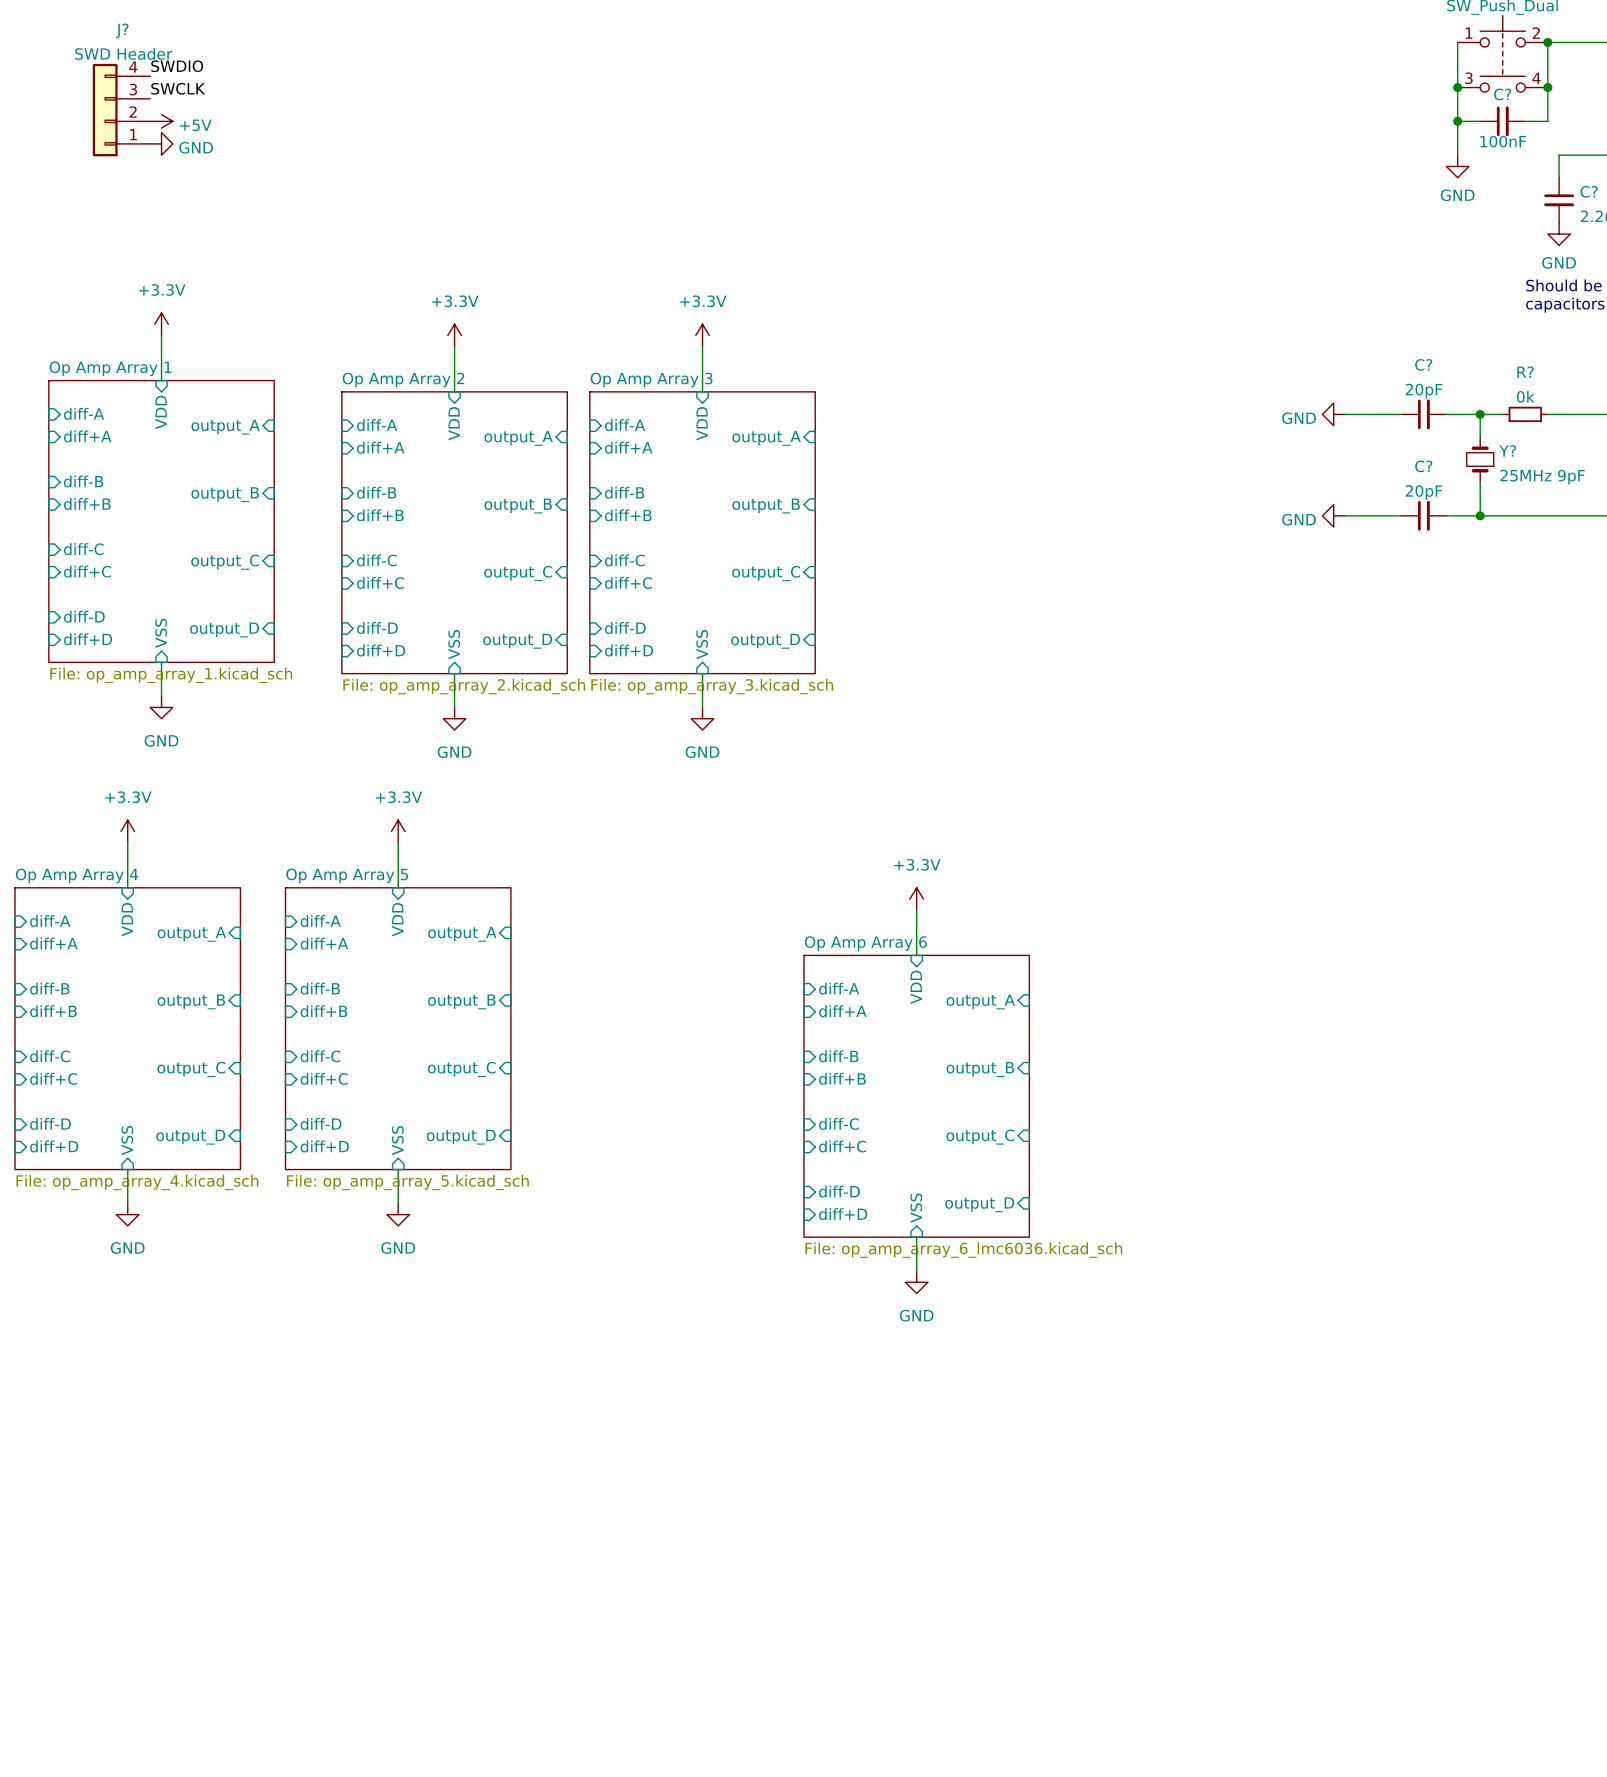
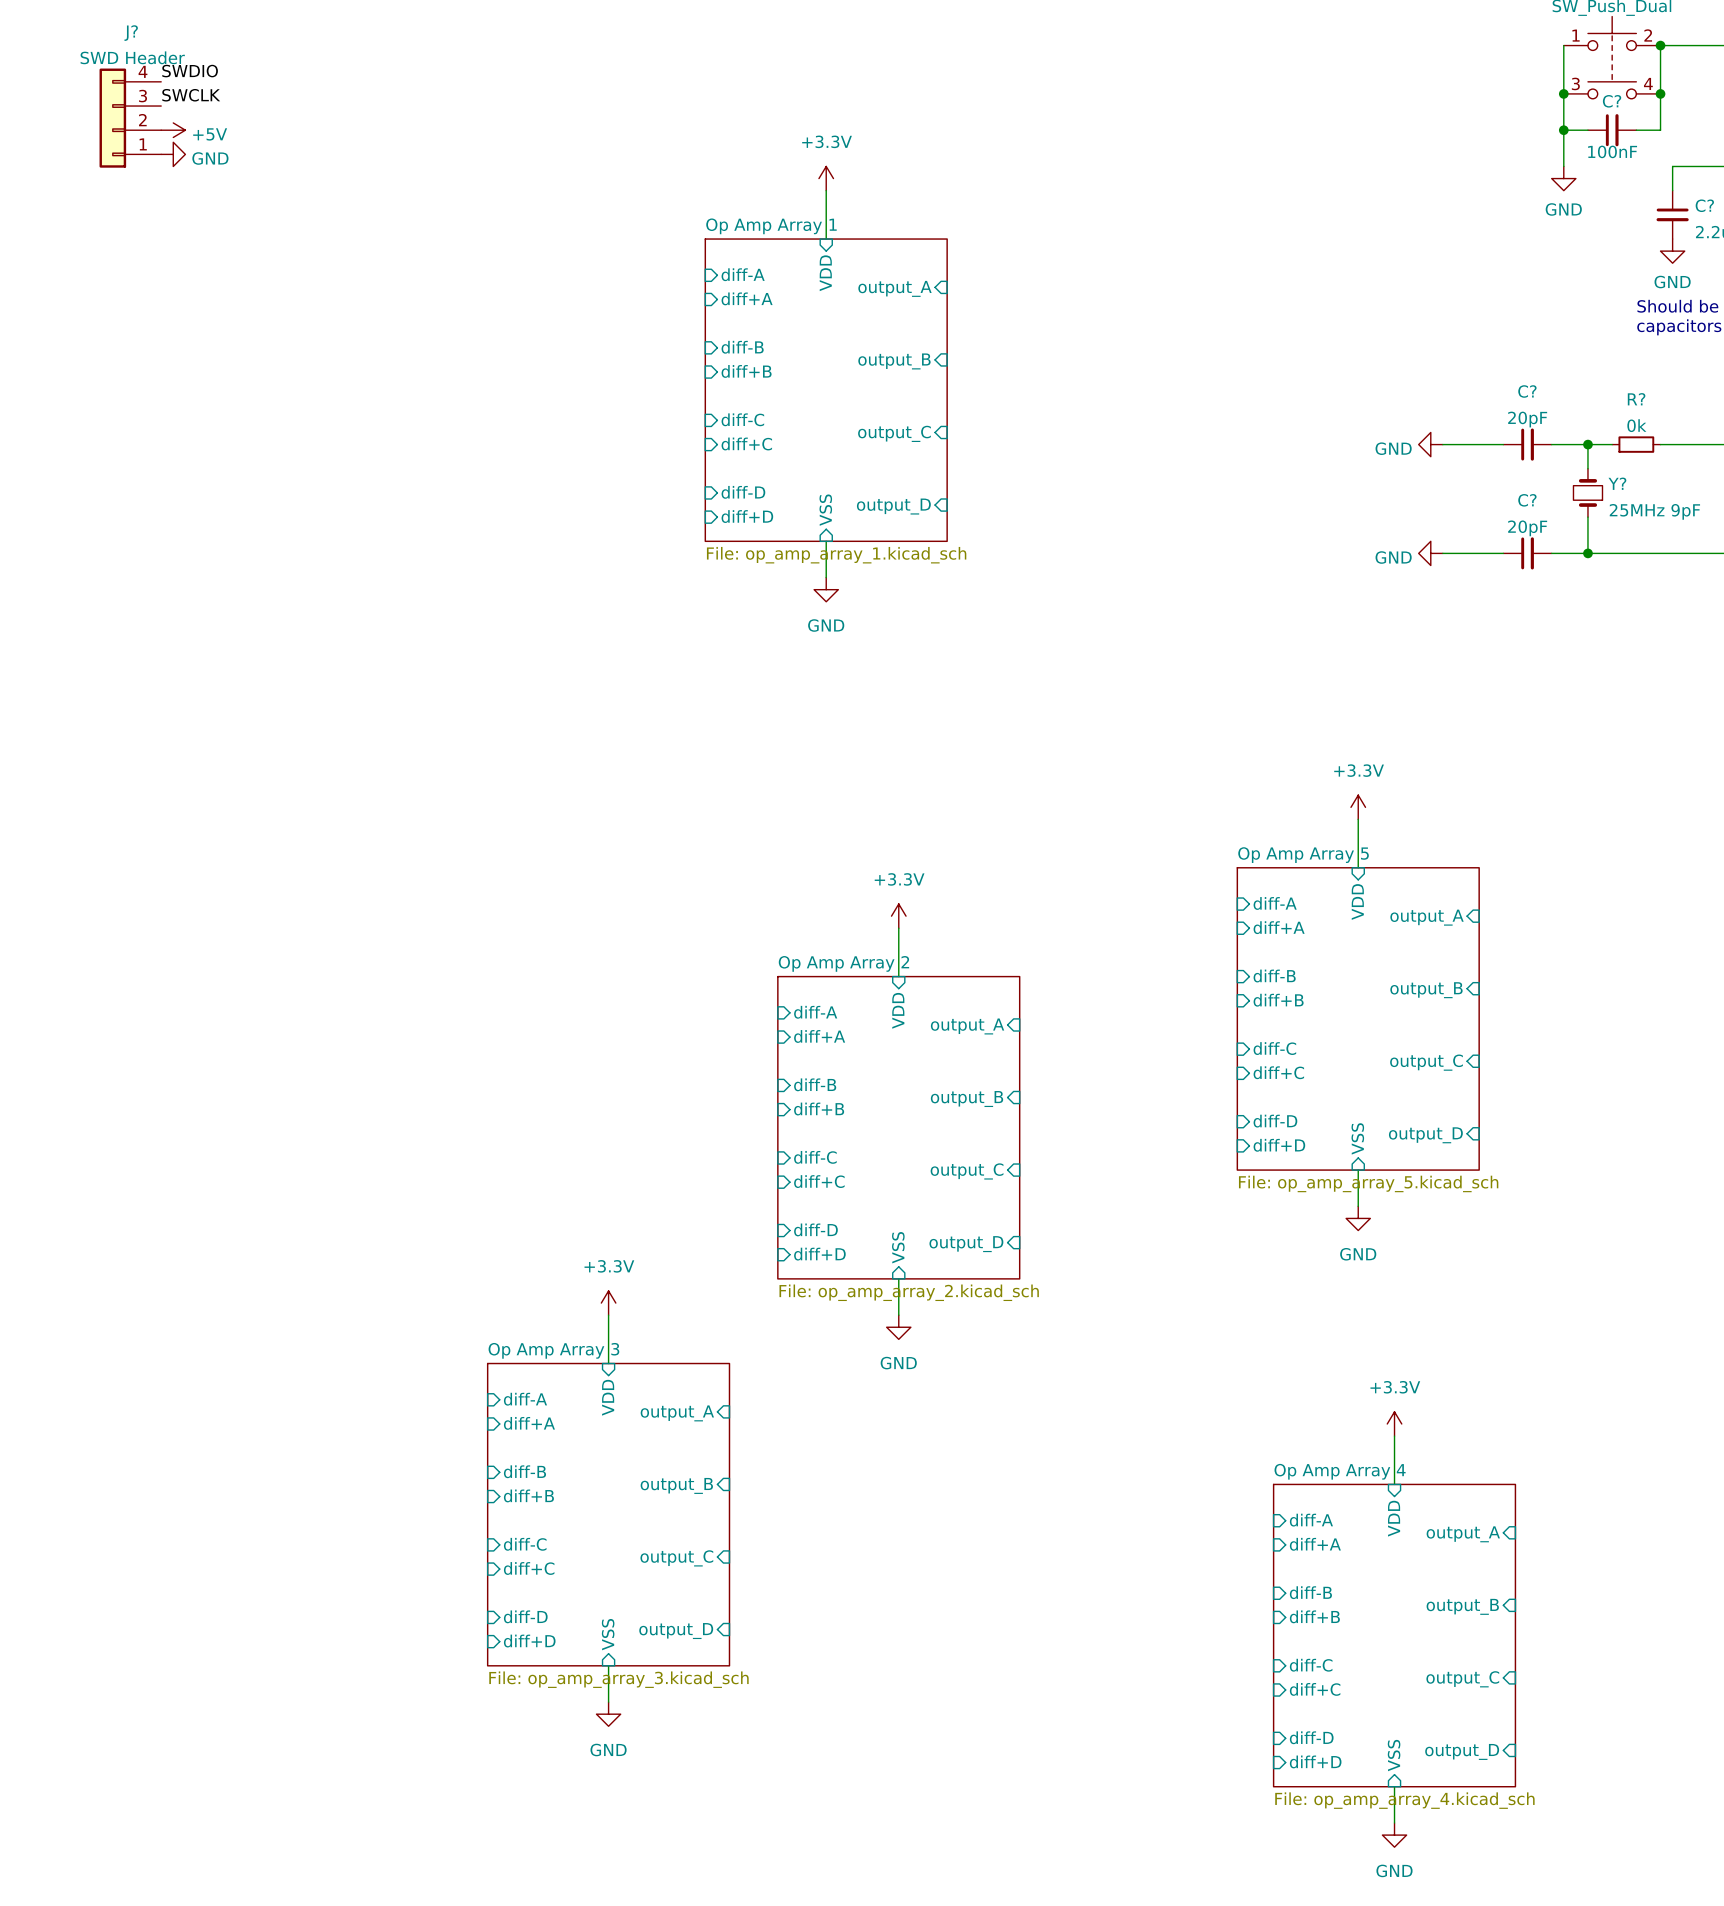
power symbol: none -> +3.3V (826, 178)
sheet pin: none -> VDD (825, 273)
sheet pin: none -> diff-A (743, 274)
sheet pin: none -> output_A (895, 288)
sheet pin: none -> diff+A (747, 298)
sheet pin: none -> diff-B (742, 347)
power symbol: +3.3V (161, 324) -> none
wire: (161, 335) (161, 380) -> none
power symbol: +3.3V (454, 335) -> none
power symbol: +3.3V (702, 335) -> none
sheet pin: none -> output_B (894, 361)
wire: (454, 346) (454, 391) -> none
sheet pin: none -> diff+B (746, 371)
wire: (702, 346) (702, 391) -> (826, 190) (826, 239)
sheet pin: none -> diff-C (742, 419)
sheet pin: none -> output_C (894, 433)
sheet pin: VDD (161, 412) -> none
sheet pin: diff-A (84, 413) -> none
sheet pin: VDD (454, 423) -> none
sheet pin: VDD (702, 423) -> none
sheet pin: diff-A (377, 425) -> none
sheet pin: diff-A (625, 425) -> diff+C (746, 443)
sheet pin: output_A (225, 427) -> none
sheet pin: diff+A (87, 436) -> none
sheet pin: output_A (518, 438) -> none
sheet pin: output_A (766, 438) -> none
sheet pin: diff+A (380, 447) -> none
sheet pin: diff+A (628, 447) -> diff-D (743, 492)
sheet pin: none -> output_D (893, 506)
sheet pin: none -> VSS (825, 510)
sheet pin: diff-B (83, 481) -> none
sheet pin: diff-B (376, 492) -> none
sheet pin: diff-B (624, 492) -> diff+D (747, 516)
sheet pin: output_B (225, 494) -> none
sheet pin: diff+B (87, 504) -> none
sheet pin: output_B (518, 505) -> none
sheet pin: output_B (766, 505) -> none
sheet pin: diff+B (380, 515) -> none
sheet pin: diff+B (628, 515) -> none
sheet Op Amp Array 1 position: (161, 521) -> (826, 390)
sheet Op Amp Array 2 position: (454, 532) -> (898, 1127)
sheet Op Amp Array 3 position: (702, 532) -> (608, 1514)
sheet pin: diff-C (83, 549) -> none
power symbol: none -> GND (826, 589)
sheet pin: diff-C (376, 560) -> none
sheet pin: diff-C (624, 560) -> none
sheet pin: output_C (225, 562) -> none
sheet pin: diff+C (87, 571) -> none
sheet pin: output_C (518, 573) -> none
sheet pin: output_C (766, 573) -> none
sheet pin: diff+C (380, 582) -> none
sheet pin: diff+C (628, 582) -> none
sheet pin: diff-D (84, 616) -> none
sheet pin: diff-D (377, 628) -> none
sheet pin: diff-D (625, 628) -> none
sheet pin: output_D (224, 629) -> none
sheet pin: VSS (161, 633) -> none
sheet pin: diff+D (88, 639) -> none
sheet pin: output_D (517, 641) -> none
sheet pin: output_D (765, 641) -> none
sheet pin: VSS (454, 644) -> none
sheet pin: VSS (702, 644) -> none
sheet pin: diff+D (381, 650) -> none
sheet pin: diff+D (629, 650) -> none
wire: (161, 662) (161, 696) -> none
wire: (454, 673) (454, 707) -> none
wire: (702, 673) (702, 707) -> (826, 541) (826, 577)
power symbol: GND (161, 707) -> none
power symbol: GND (454, 718) -> none
power symbol: GND (702, 718) -> none
power symbol: none -> +3.3V (1358, 807)
wire: none -> (1358, 819) (1358, 867)
power symbol: +3.3V (127, 831) -> none
power symbol: +3.3V (398, 831) -> none
sheet pin: none -> VDD (1357, 902)
wire: (127, 842) (127, 887) -> none
wire: (398, 842) (398, 887) -> none
sheet pin: none -> diff-A (1275, 903)
sheet pin: none -> output_A (1427, 917)
sheet pin: none -> diff+A (1279, 927)
power symbol position: +3.3V (916, 899) -> +3.3V (898, 916)
sheet pin: none -> diff-B (1274, 976)
wire: (916, 910) (916, 955) -> (898, 928) (898, 976)
sheet pin: VDD (127, 919) -> none
sheet pin: VDD (397, 919) -> none
sheet pin: diff-A (50, 921) -> none
sheet pin: diff-A (320, 921) -> none
sheet pin: none -> output_B (1426, 990)
sheet pin: none -> diff+B (1278, 1000)
sheet pin: output_A (191, 934) -> none
sheet pin: output_A (462, 934) -> none
sheet pin: diff+A (53, 943) -> none
sheet pin: diff+A (324, 943) -> none
sheet pin: none -> diff-C (1274, 1048)
sheet pin position: VDD (916, 987) -> VDD (898, 1010)
sheet pin: diff-B (49, 988) -> none
sheet pin: diff-B (320, 988) -> none
sheet pin position: diff-A (839, 988) -> diff-A (815, 1012)
sheet pin: none -> output_C (1426, 1062)
sheet pin: none -> diff+C (1278, 1072)
sheet pin: output_B (191, 1001) -> none
sheet pin: output_B (461, 1001) -> none
sheet pin position: output_A (980, 1001) -> output_A (967, 1026)
sheet pin: diff+B (53, 1011) -> none
sheet pin: diff+B (323, 1011) -> none
sheet pin position: diff+A (842, 1011) -> diff+A (819, 1036)
sheet Op Amp Array 4 position: (127, 1028) -> (1394, 1635)
sheet Op Amp Array 5 position: (398, 1028) -> (1358, 1018)
sheet pin: none -> diff-D (1275, 1121)
sheet pin: diff-C (50, 1056) -> none
sheet pin: diff-C (320, 1056) -> none
sheet pin position: diff-B (838, 1056) -> diff-B (815, 1084)
sheet pin: none -> output_D (1425, 1135)
sheet pin: none -> VSS (1357, 1138)
sheet pin: none -> diff+D (1279, 1145)
sheet pin: output_C (191, 1069) -> none
sheet pin: output_C (461, 1069) -> none
sheet pin position: output_B (980, 1069) -> output_B (967, 1099)
sheet pin: diff+C (53, 1078) -> none
sheet pin: diff+C (324, 1078) -> none
sheet pin position: diff+B (842, 1078) -> diff+B (819, 1109)
wire: none -> (1358, 1170) (1358, 1206)
sheet Op Amp Array 6: File: op_amp_array_6_lmc6036.kicad_sch (916, 1096) -> none
sheet pin: diff-D (50, 1123) -> none
sheet pin: diff-D (321, 1123) -> none
sheet pin position: diff-C (838, 1123) -> diff-C (815, 1157)
power symbol: none -> GND (1358, 1218)
sheet pin: output_D (190, 1137) -> none
sheet pin: output_D (461, 1137) -> none
sheet pin position: output_C (980, 1137) -> output_C (967, 1171)
sheet pin: VSS (127, 1140) -> none
sheet pin: VSS (397, 1140) -> none
sheet pin: diff+D (54, 1146) -> none
sheet pin: diff+D (324, 1146) -> none
sheet pin position: diff+C (842, 1146) -> diff+C (819, 1181)
wire: (127, 1169) (127, 1203) -> none
wire: (398, 1169) (398, 1203) -> none
sheet pin position: diff-D (839, 1191) -> diff-D (815, 1229)
sheet pin position: output_D (979, 1204) -> output_D (966, 1244)
sheet pin position: VSS (916, 1208) -> VSS (898, 1247)
power symbol: GND (127, 1214) -> none
power symbol: GND (398, 1214) -> none
power symbol: none -> +3.3V (608, 1303)
sheet pin position: diff+D (843, 1214) -> diff+D (819, 1254)
wire: none -> (608, 1315) (608, 1363)
wire: (916, 1237) (916, 1270) -> (898, 1278) (898, 1315)
power symbol position: GND (916, 1282) -> GND (898, 1327)
sheet pin: none -> VDD (608, 1397)
sheet pin: none -> diff-A (525, 1399)
sheet pin: none -> output_A (677, 1413)
sheet pin: none -> diff+A (529, 1423)
power symbol: none -> +3.3V (1394, 1423)
wire: none -> (1394, 1436) (1394, 1484)
sheet pin: none -> diff-B (524, 1471)
sheet pin: none -> output_B (676, 1485)
sheet pin: none -> diff+B (528, 1495)
sheet pin: none -> VDD (1394, 1518)
sheet pin: none -> diff-A (1311, 1520)
sheet pin: none -> output_A (1463, 1534)
sheet pin: none -> diff-C (525, 1544)
sheet pin: none -> diff+A (1315, 1544)
sheet pin: none -> output_C (676, 1558)
sheet pin: none -> diff+C (529, 1568)
sheet pin: none -> diff-B (1310, 1592)
sheet pin: none -> output_B (1462, 1606)
sheet pin: none -> diff-D (525, 1616)
sheet pin: none -> diff+B (1314, 1616)
sheet pin: none -> output_D (676, 1631)
sheet pin: none -> VSS (608, 1634)
sheet pin: none -> diff+D (529, 1641)
wire: none -> (608, 1665) (608, 1702)
sheet pin: none -> diff-C (1311, 1665)
sheet pin: none -> output_C (1462, 1679)
sheet pin: none -> diff+C (1315, 1689)
power symbol: none -> GND (608, 1714)
sheet pin: none -> diff-D (1311, 1737)
sheet pin: none -> output_D (1462, 1751)
sheet pin: none -> VSS (1394, 1755)
sheet pin: none -> diff+D (1315, 1761)
wire: none -> (1394, 1786) (1394, 1823)
power symbol: none -> GND (1394, 1835)

